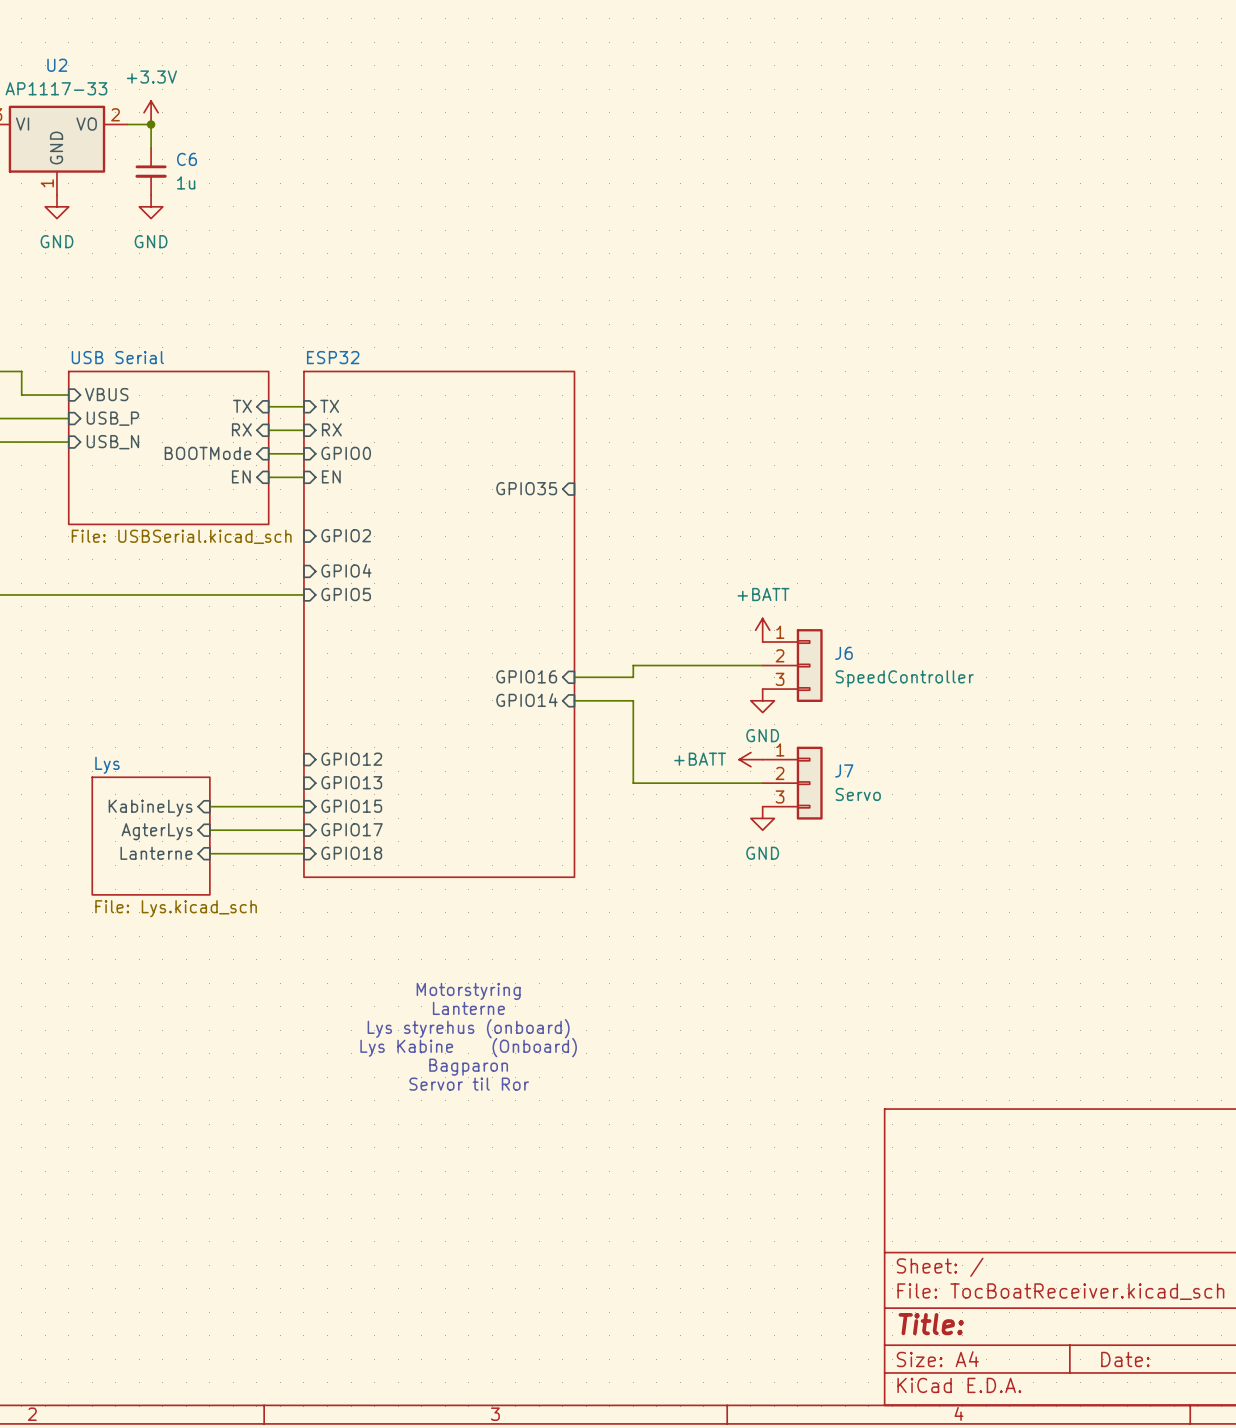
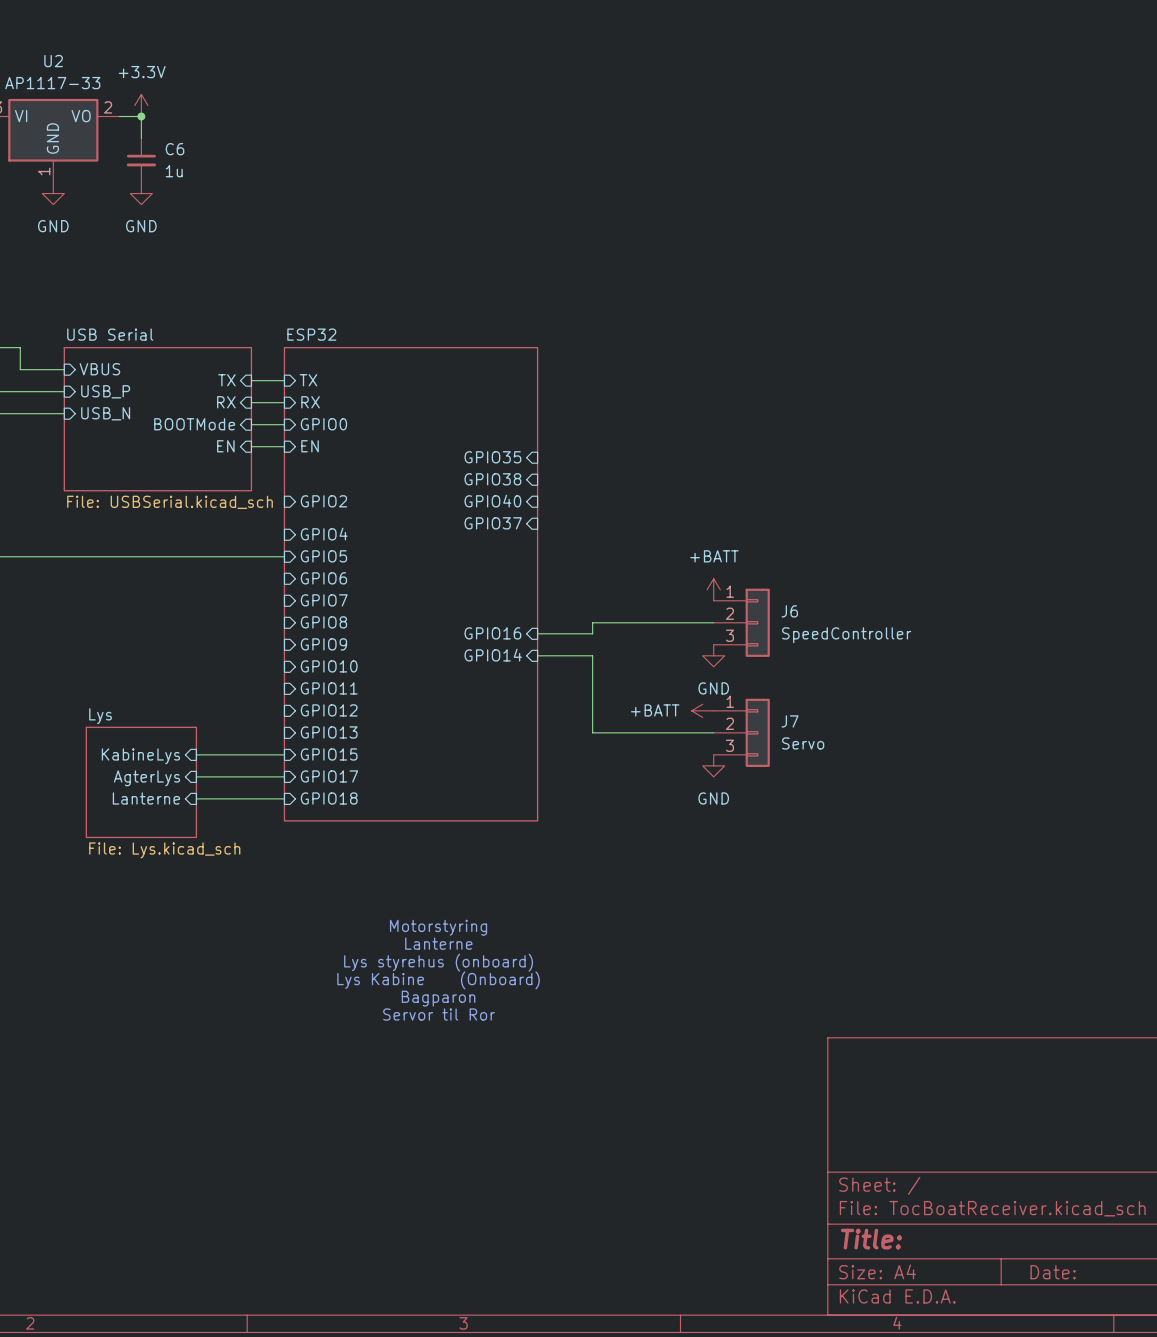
sheet pin: none -> GPIO38 (492, 479)
sheet pin: none -> GPIO40 (492, 501)
sheet pin: none -> GPIO37 (493, 523)
sheet pin: none -> GPIO6 (323, 578)
sheet pin: none -> GPIO7 (324, 600)
sheet pin: none -> GPIO8 (323, 622)
sheet pin: none -> GPIO9 (323, 644)
sheet pin: none -> GPIO10 (329, 666)
sheet pin: none -> GPIO11 (329, 688)

